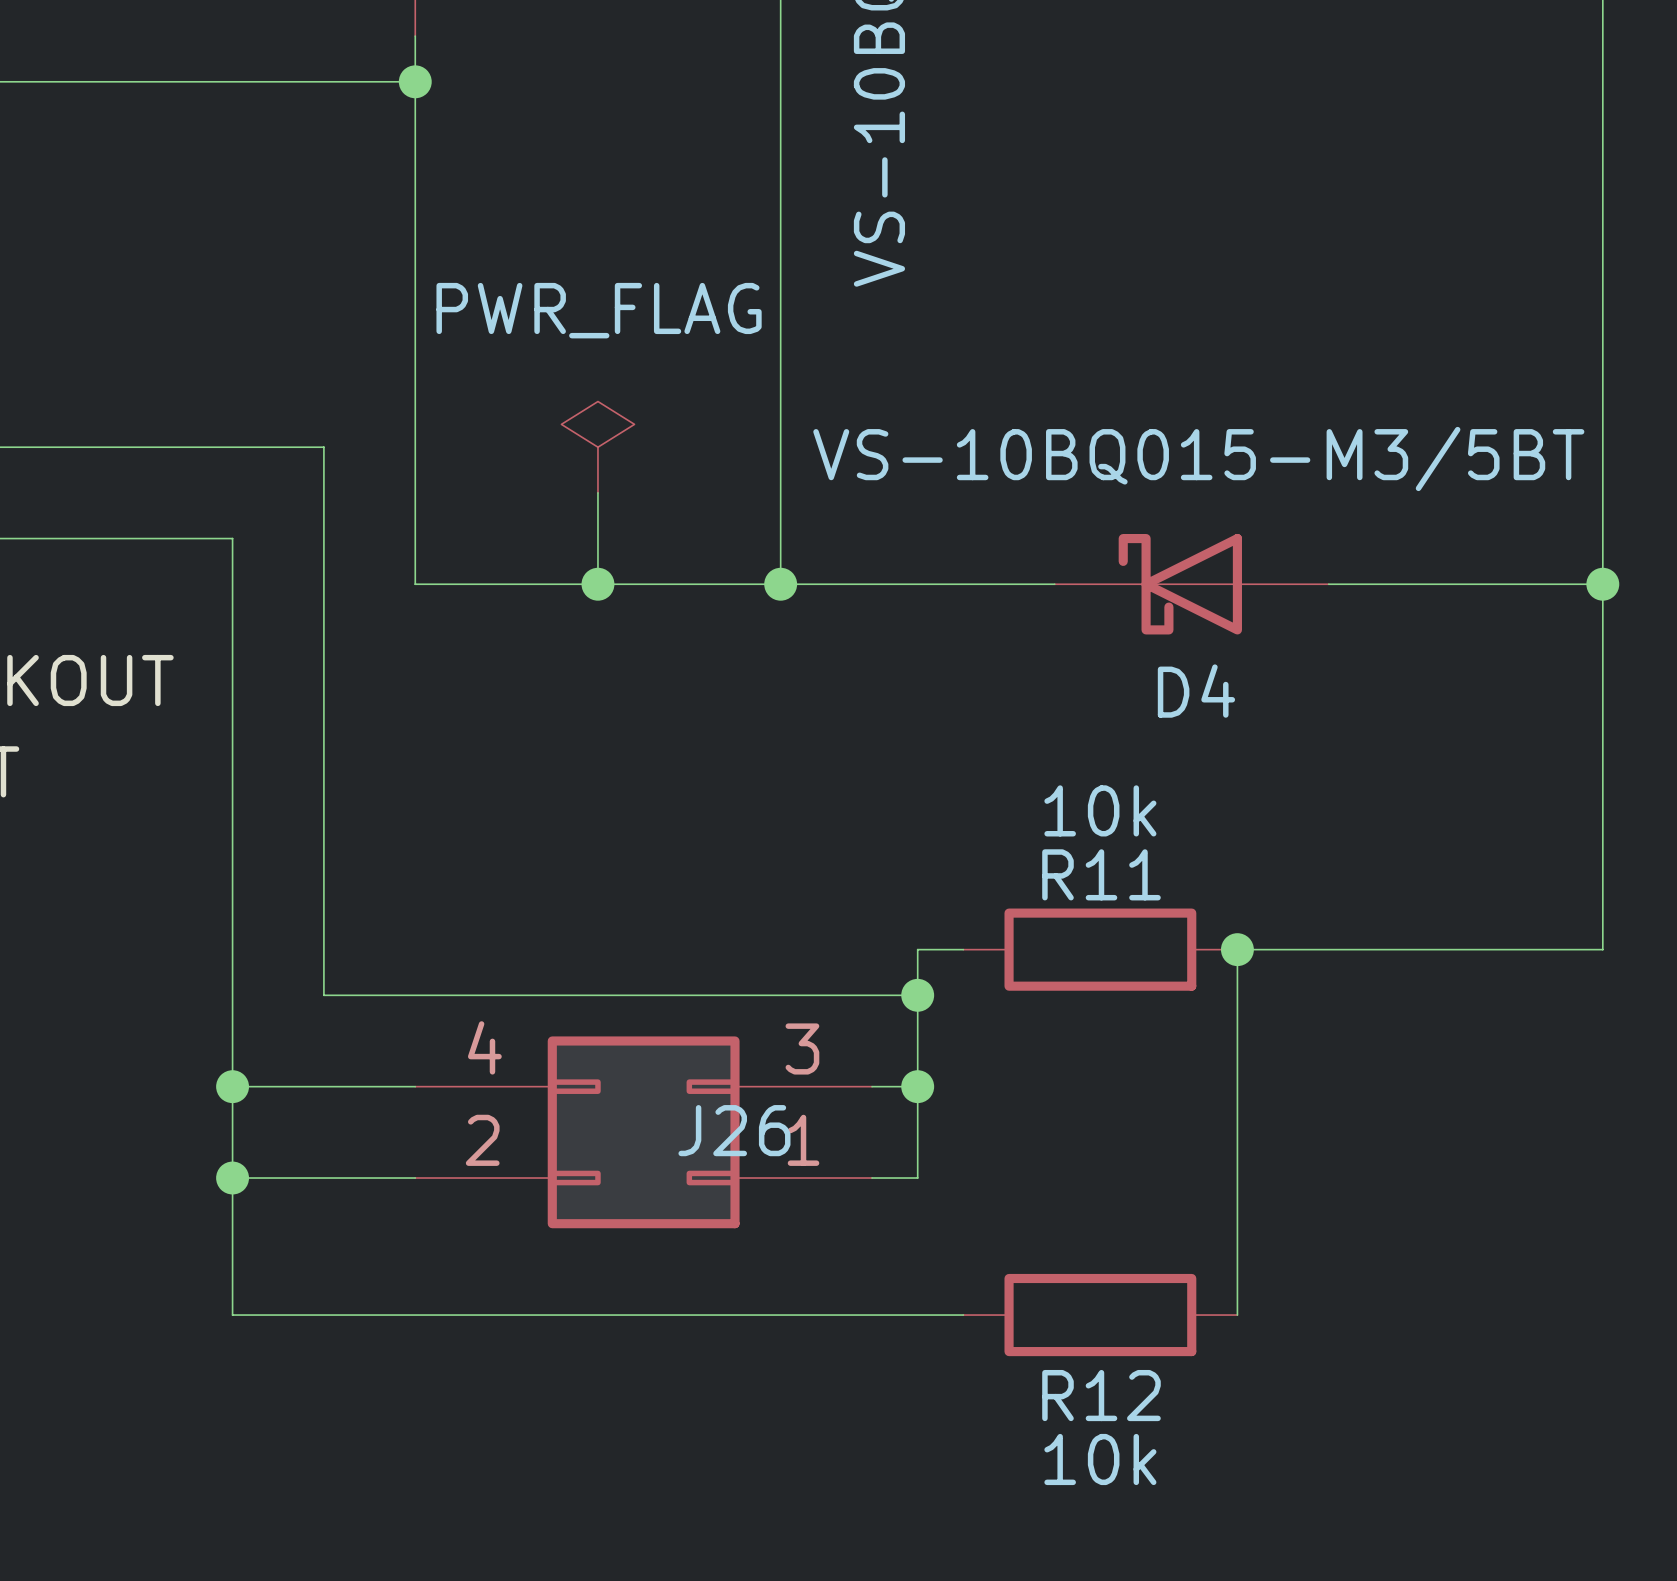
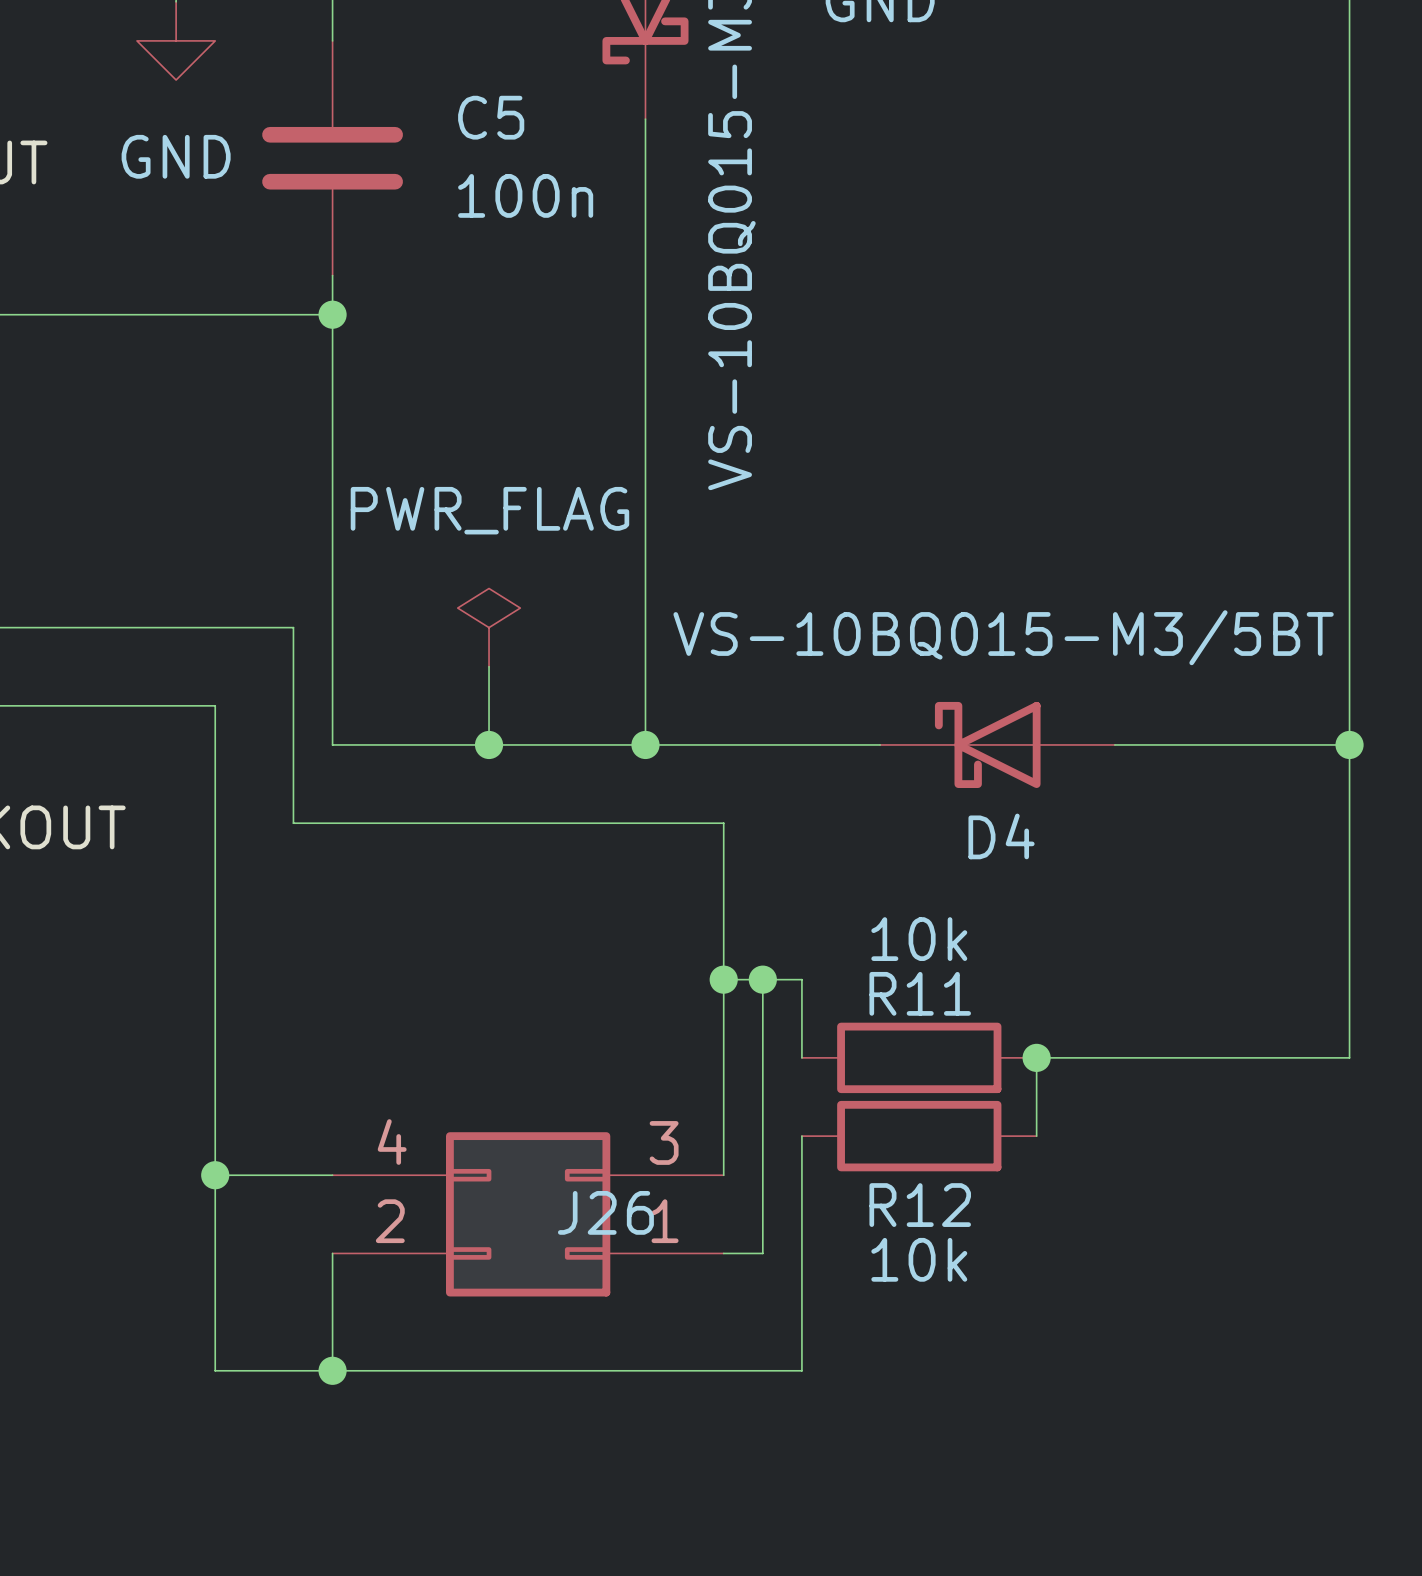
wire: (323, 447) (323, 995) (917, 995) -> (254, 627) (293, 627) (293, 823) (723, 823) (723, 1175)
wire: (232, 538) (232, 1315) (278, 1315) -> (176, 705) (215, 705) (215, 1370)
junction: none -> (723, 979)
wire: none -> (762, 979) (762, 1057)
junction: none -> (762, 979)
wire: (917, 949) (963, 949) -> (723, 979) (801, 979) (801, 1057)
junction: (917, 995) -> none
wire: (1237, 1040) (1237, 1315) -> (801, 1136) (801, 1370)
wire: (232, 1086) (278, 1086) -> none
junction position: (232, 1086) -> (215, 1175)
wire: (872, 1086) (917, 1086) -> none
junction: (917, 1086) -> none
wire: (232, 1178) (415, 1178) -> (332, 1370) (332, 1253)
junction: (232, 1178) -> none
junction: none -> (332, 1370)
R12 position: (1100, 1315) -> (919, 1136)

